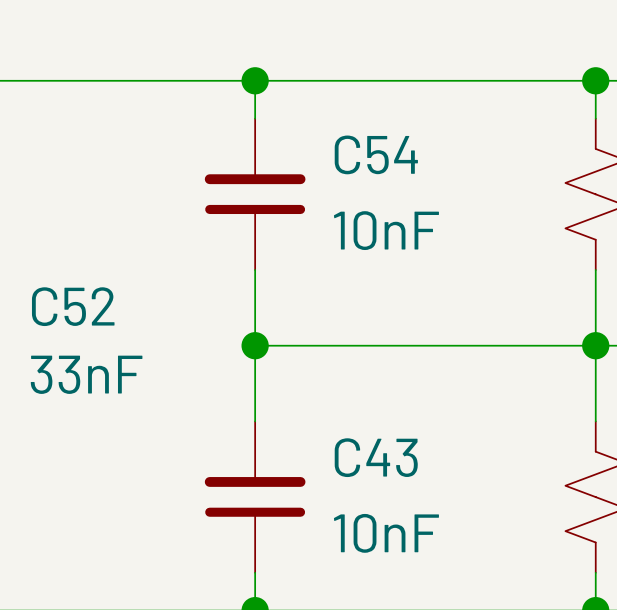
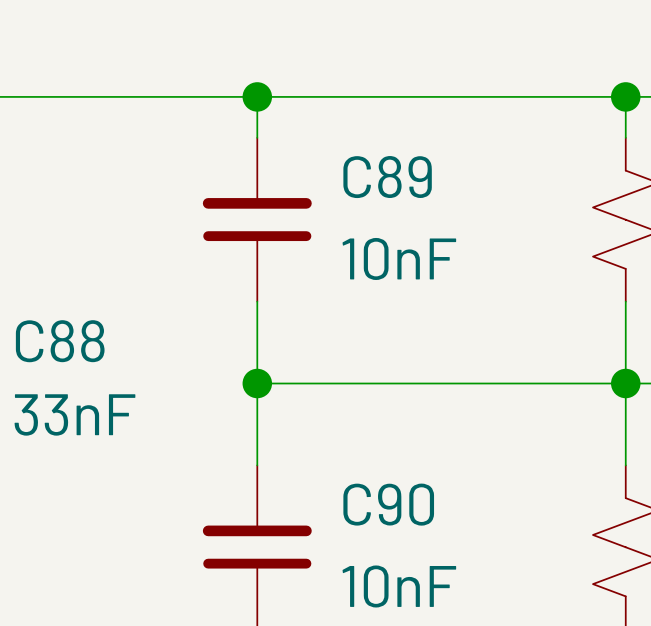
C54 name: C54 (376, 154) -> C89 (387, 177)
C52 name: C52 (73, 306) -> C88 (60, 341)
C43 name: C43 (376, 457) -> C90 (388, 504)

